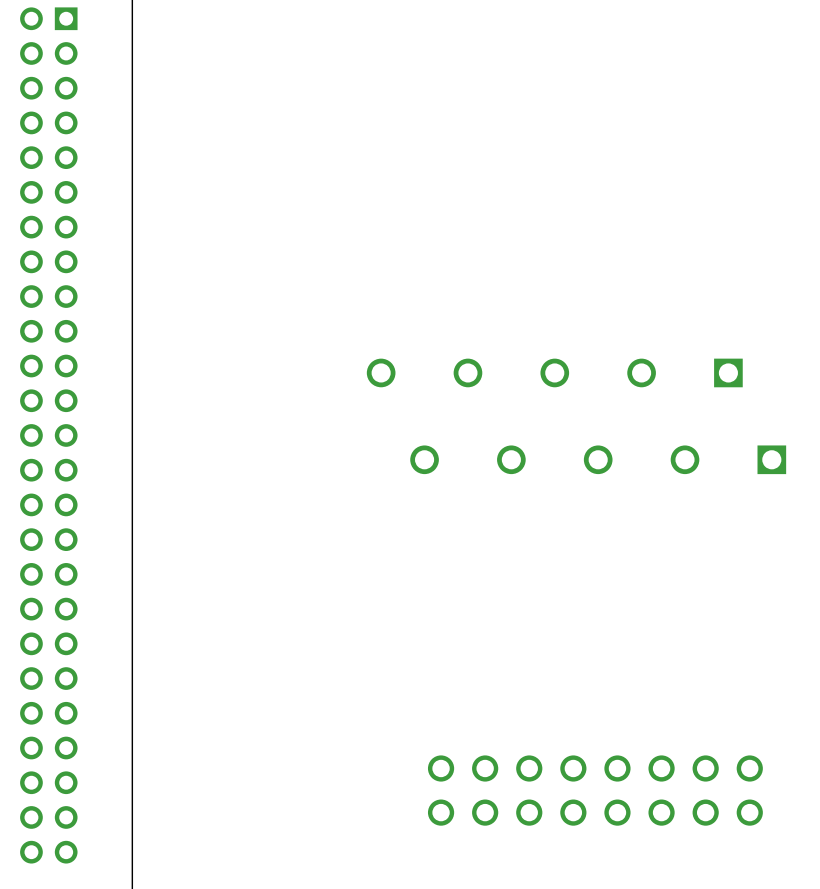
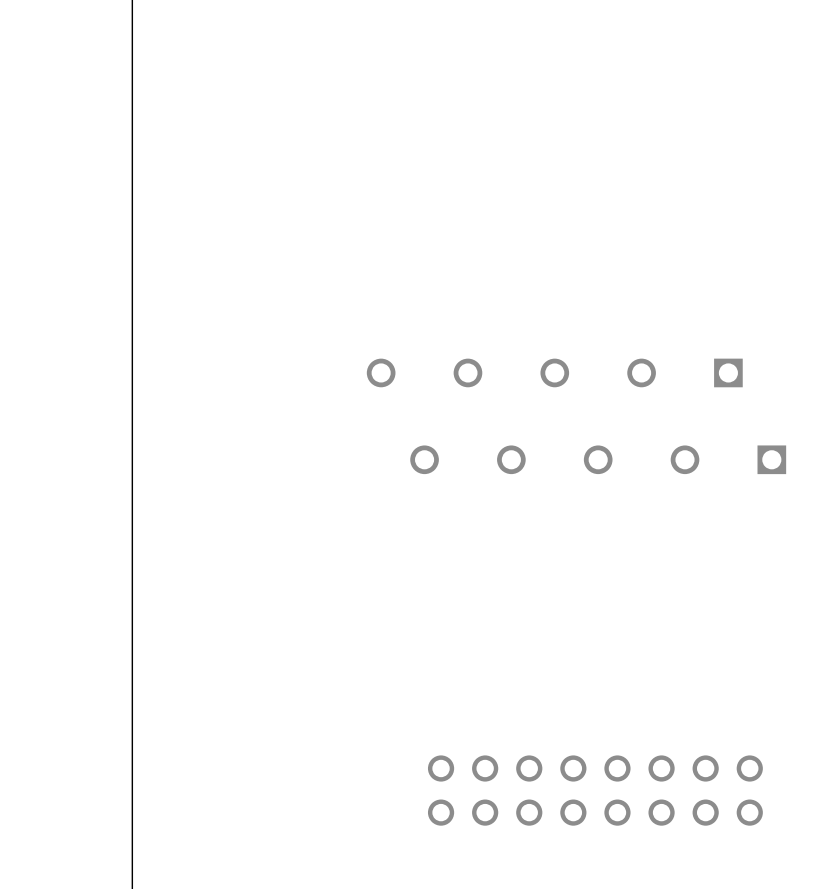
part: (48, 435) -> none

